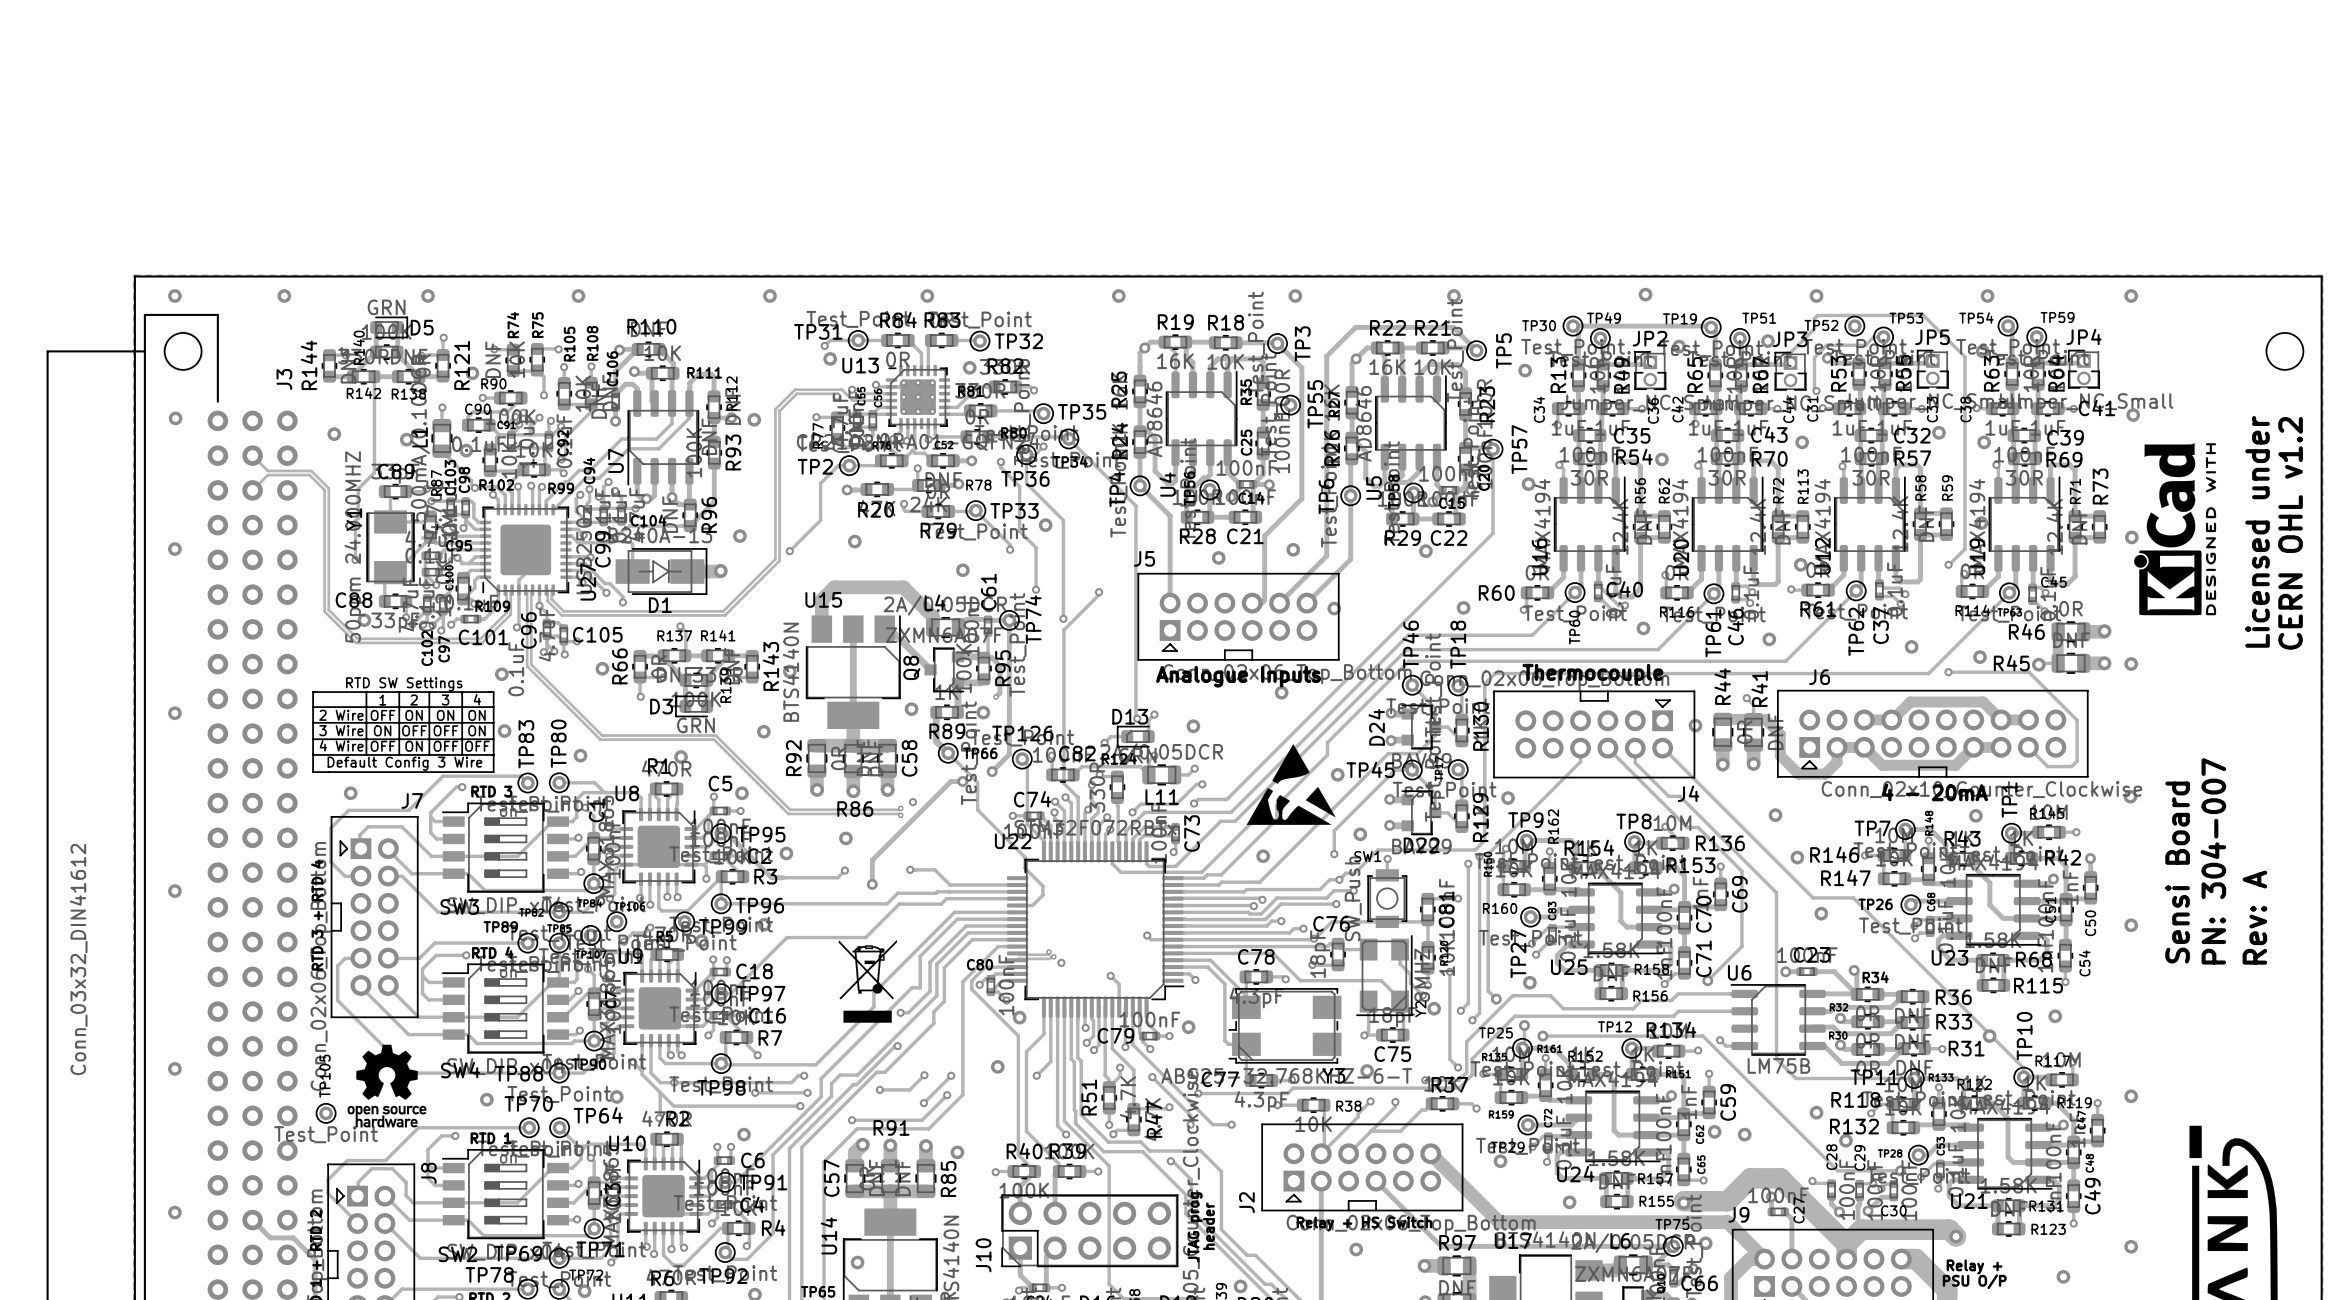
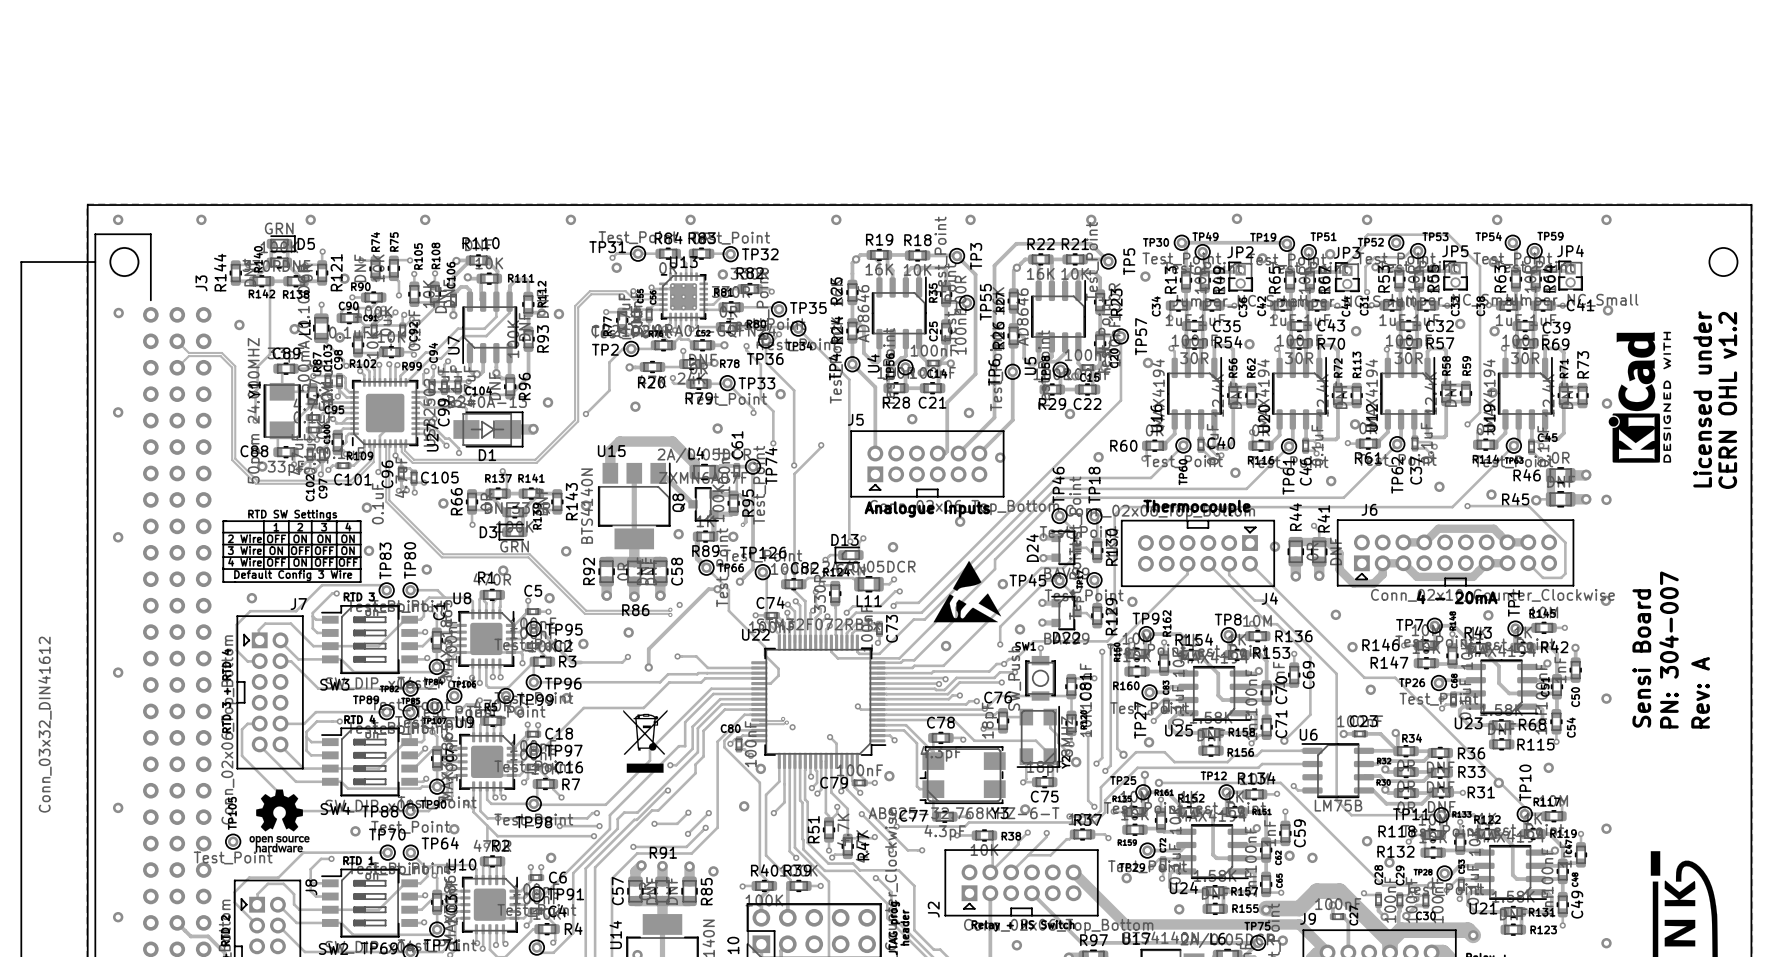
U13 name position: U13 (860, 365) -> U13 (683, 262)

